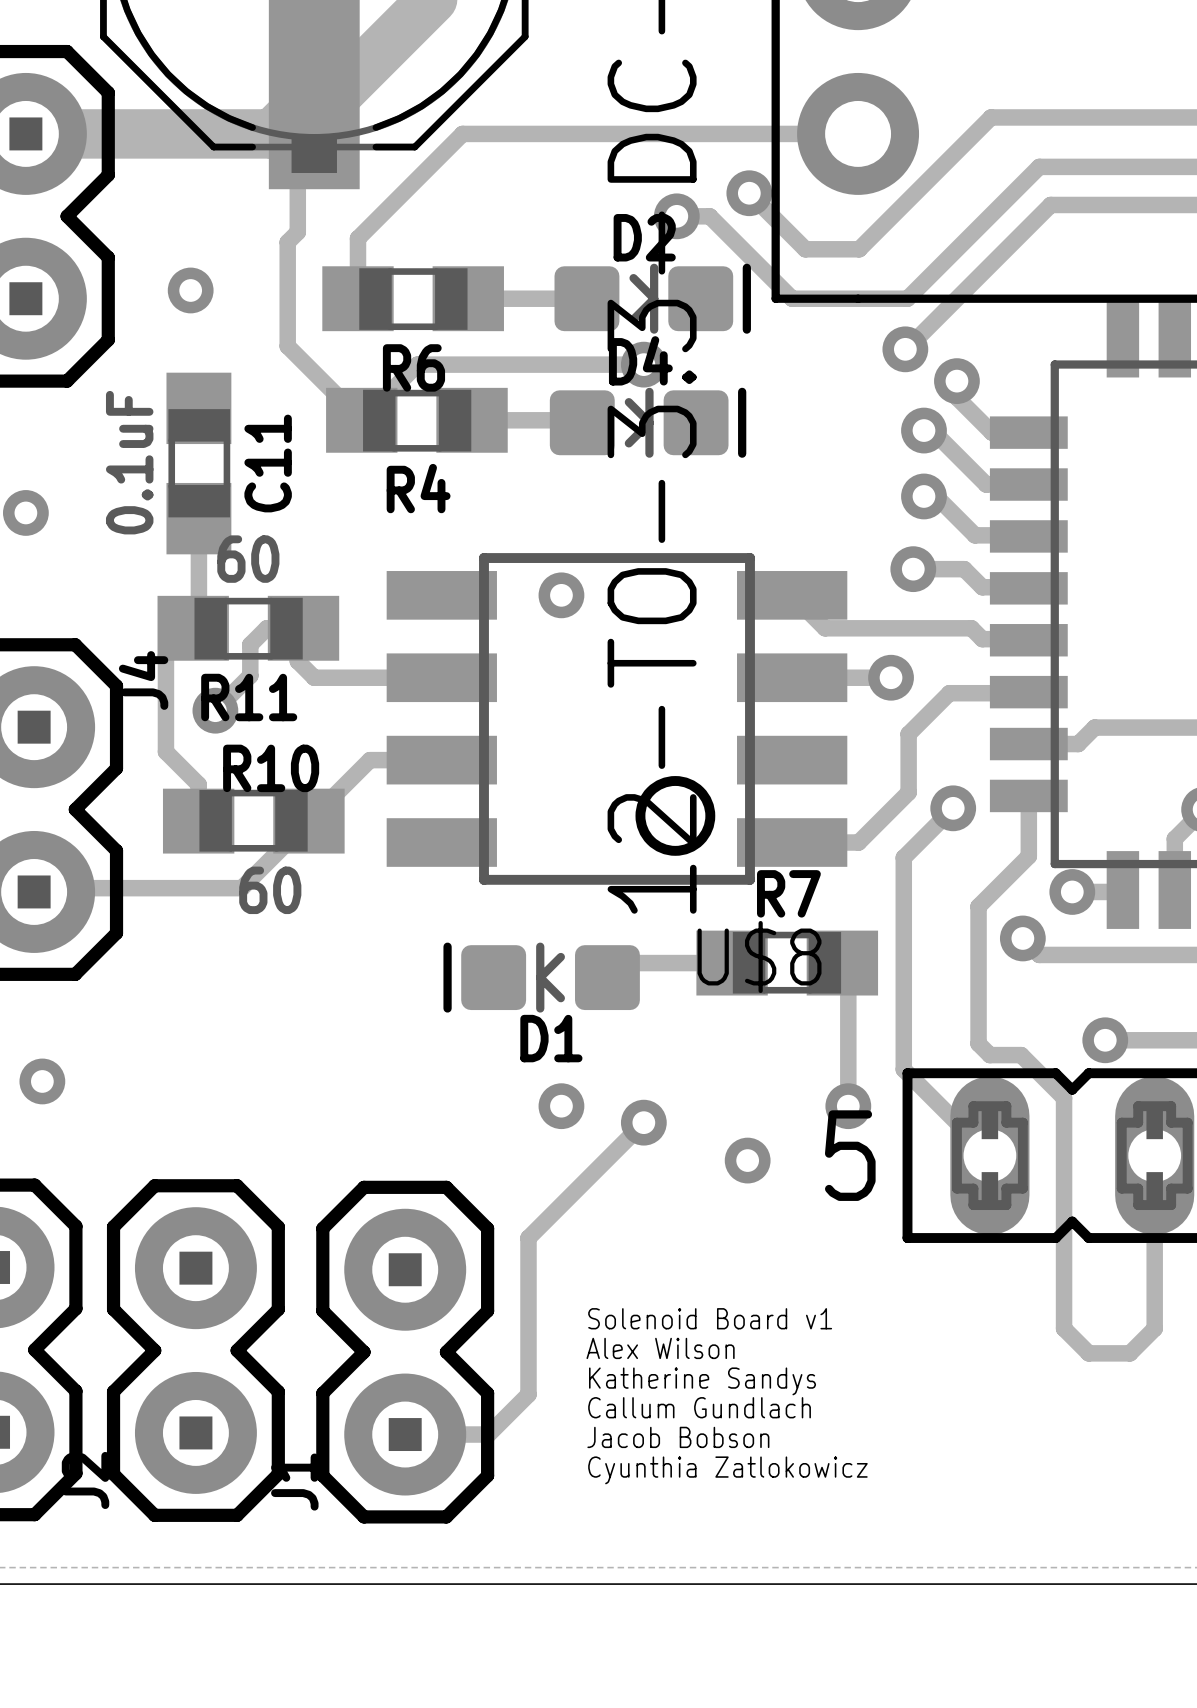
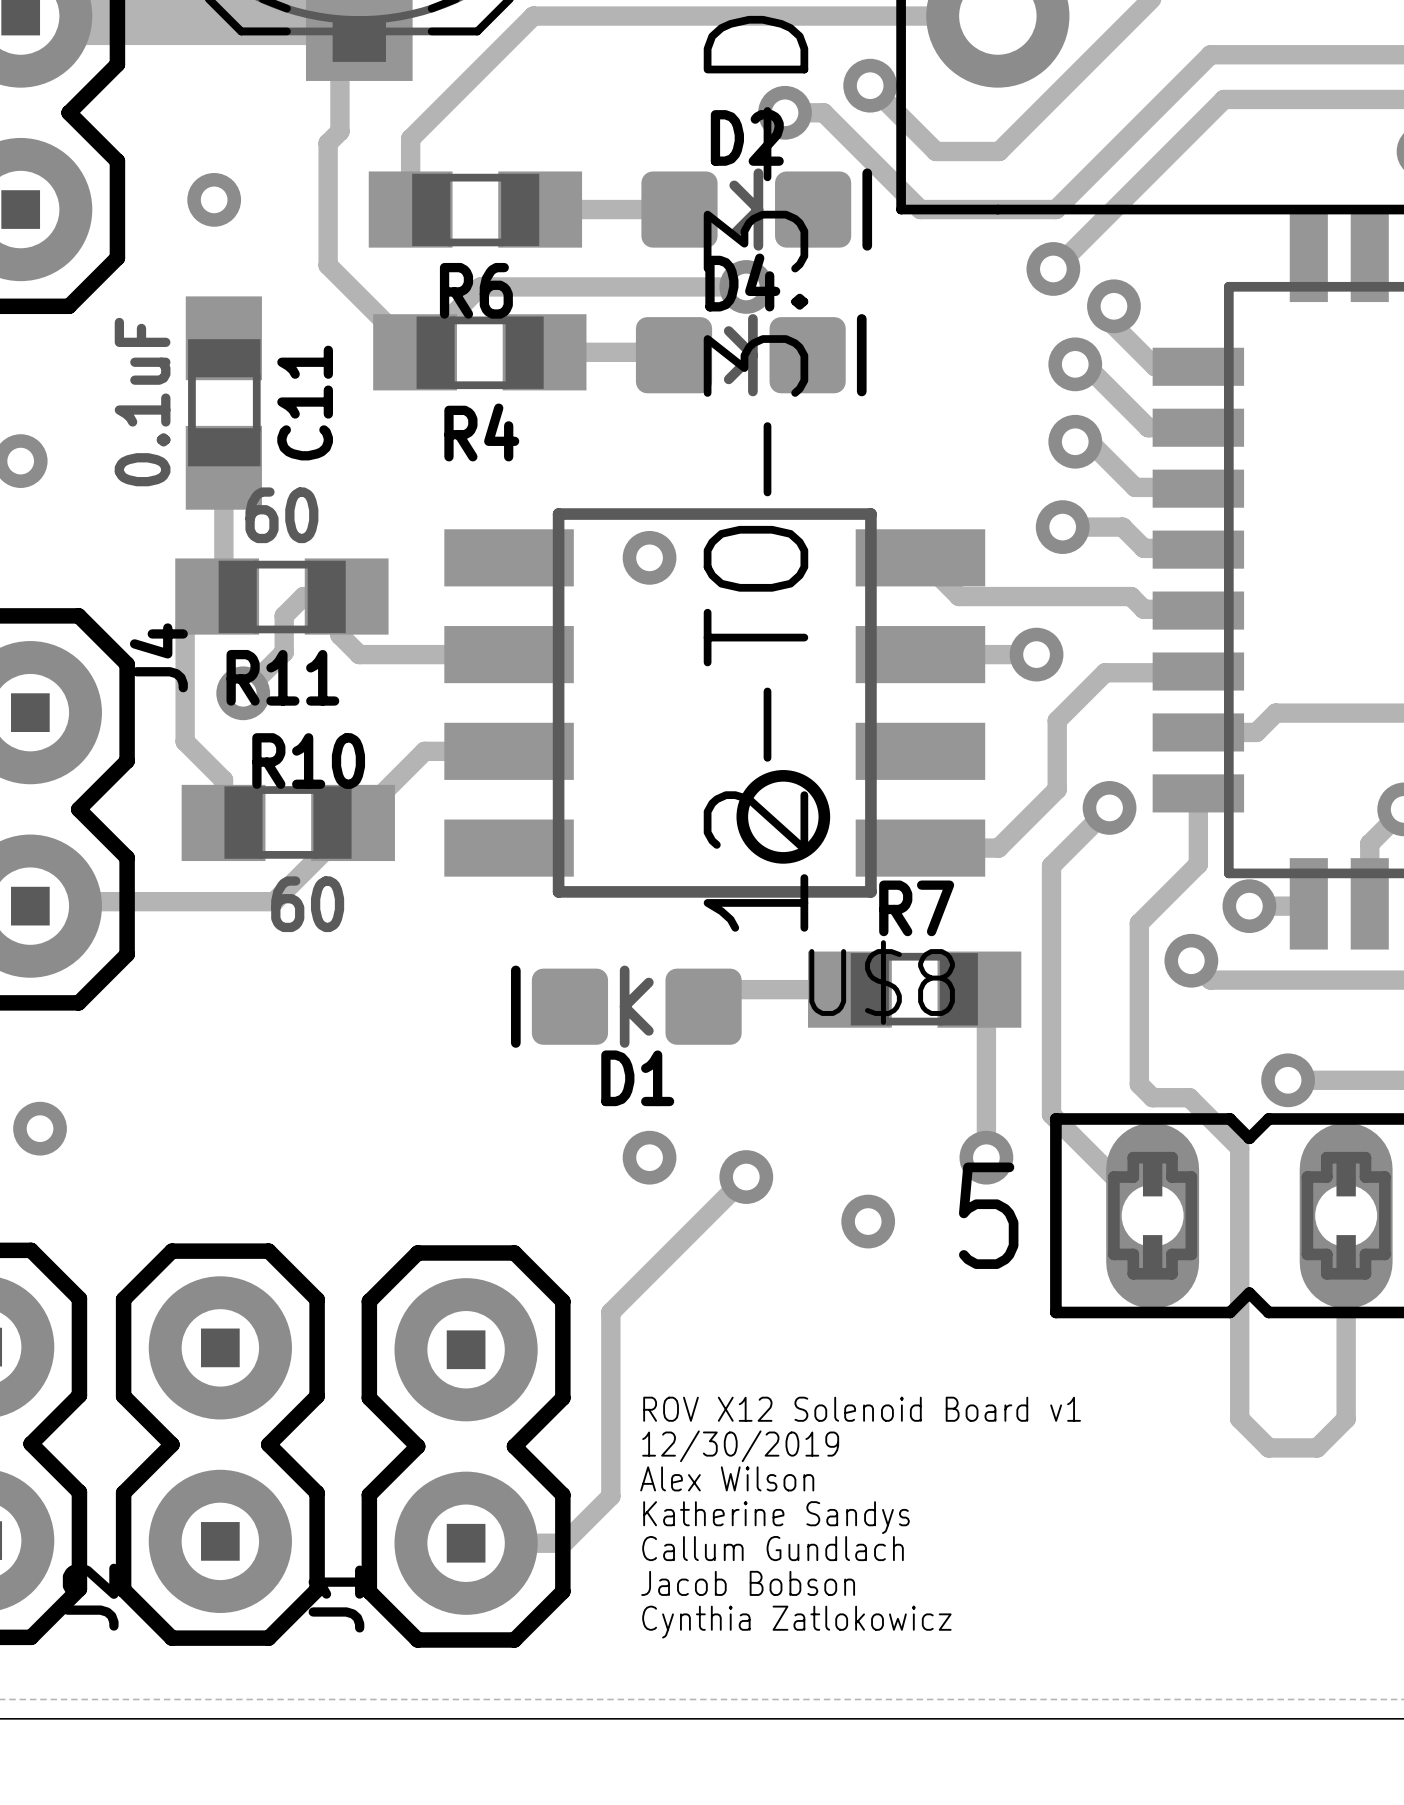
text: Solenoid Board v1 (710, 1318) -> ROV X12 Solenoid Board v1 (862, 1409)
text position: Alex Wilson (660, 1348) -> Alex Wilson (727, 1478)
text: none -> 12/30/2019 (740, 1446)
text position: Katherine Sandys (702, 1381) -> Katherine Sandys (776, 1517)
text position: Callum Gundlach (699, 1407) -> Callum Gundlach (773, 1548)
text position: Jacob Bobson (678, 1437) -> Jacob Bobson (748, 1583)
text: Cyunthia Zatlokowicz (727, 1470) -> Cynthia Zatlokowicz (796, 1622)

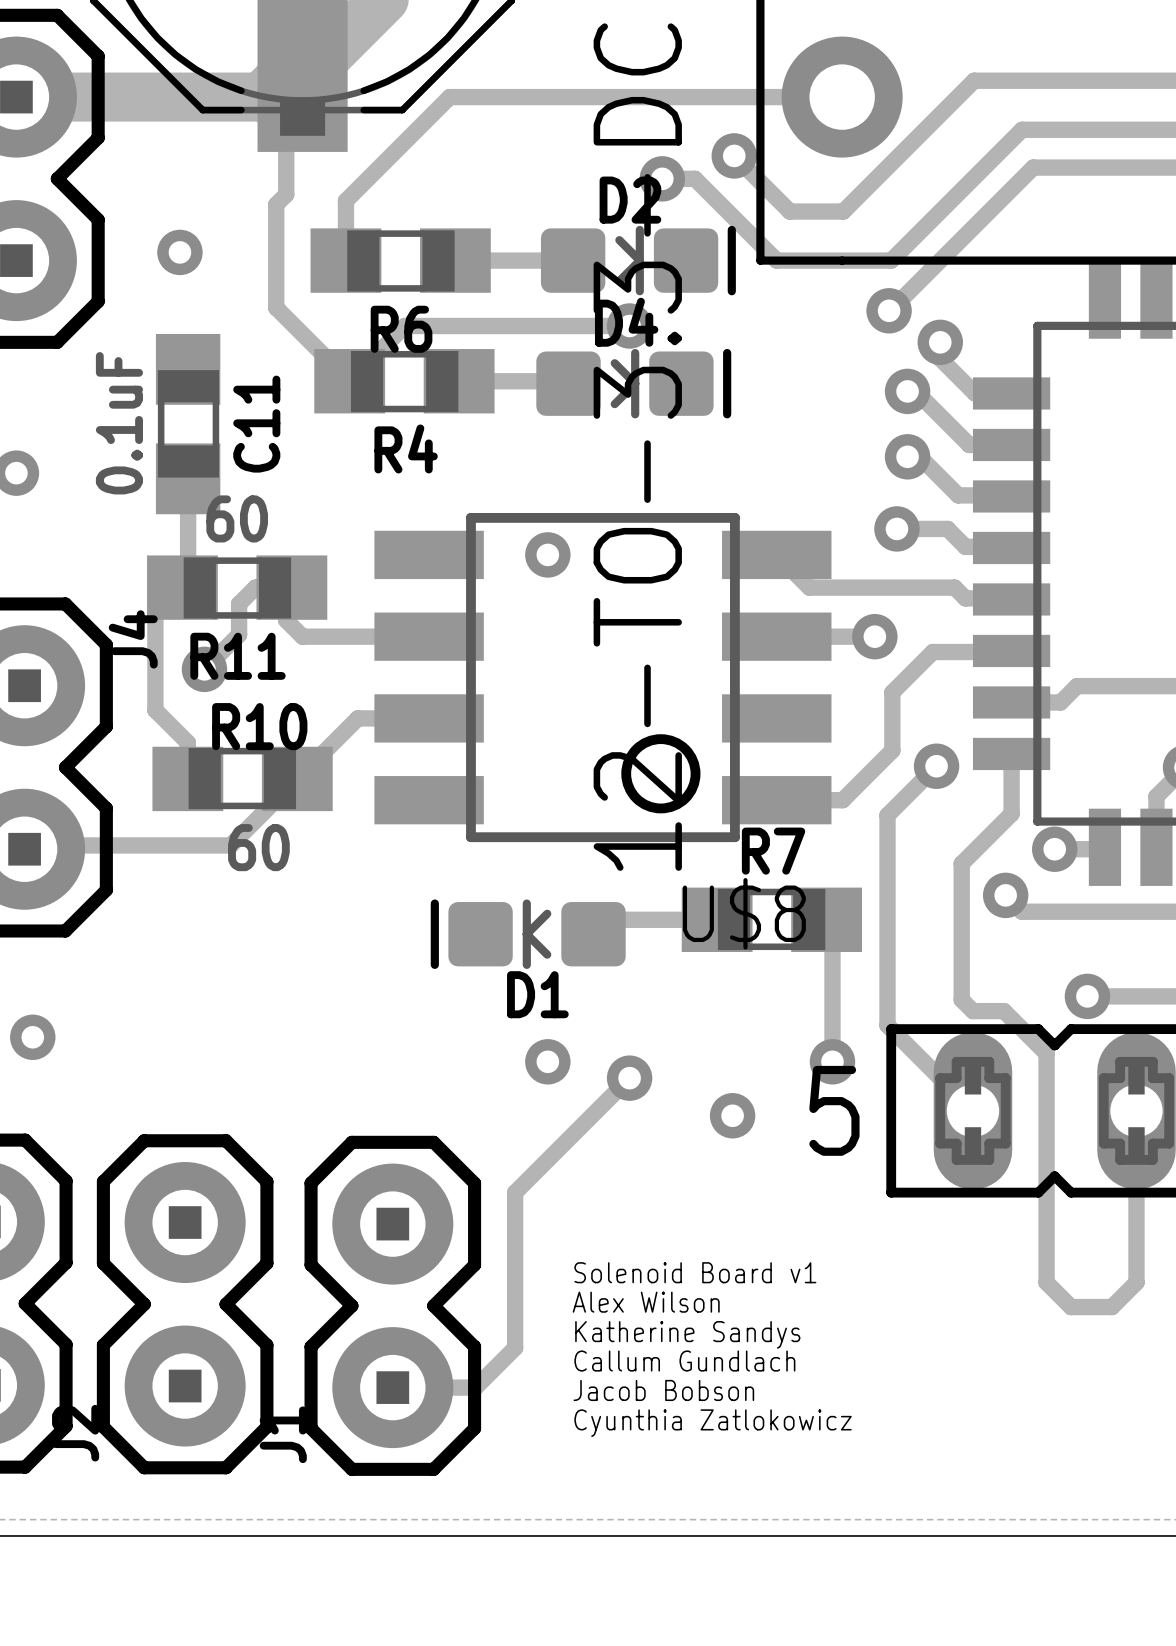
text: ROV X12 Solenoid Board v1 (862, 1409) -> Solenoid Board v1 (695, 1272)
text: 12/30/2019 (740, 1446) -> none
text position: Alex Wilson (727, 1478) -> Alex Wilson (646, 1302)
text position: Katherine Sandys (776, 1517) -> Katherine Sandys (687, 1334)
text position: Callum Gundlach (773, 1548) -> Callum Gundlach (684, 1361)
text position: Jacob Bobson (748, 1583) -> Jacob Bobson (663, 1390)
text: Cynthia Zatlokowicz (796, 1622) -> Cyunthia Zatlokowicz (713, 1423)

